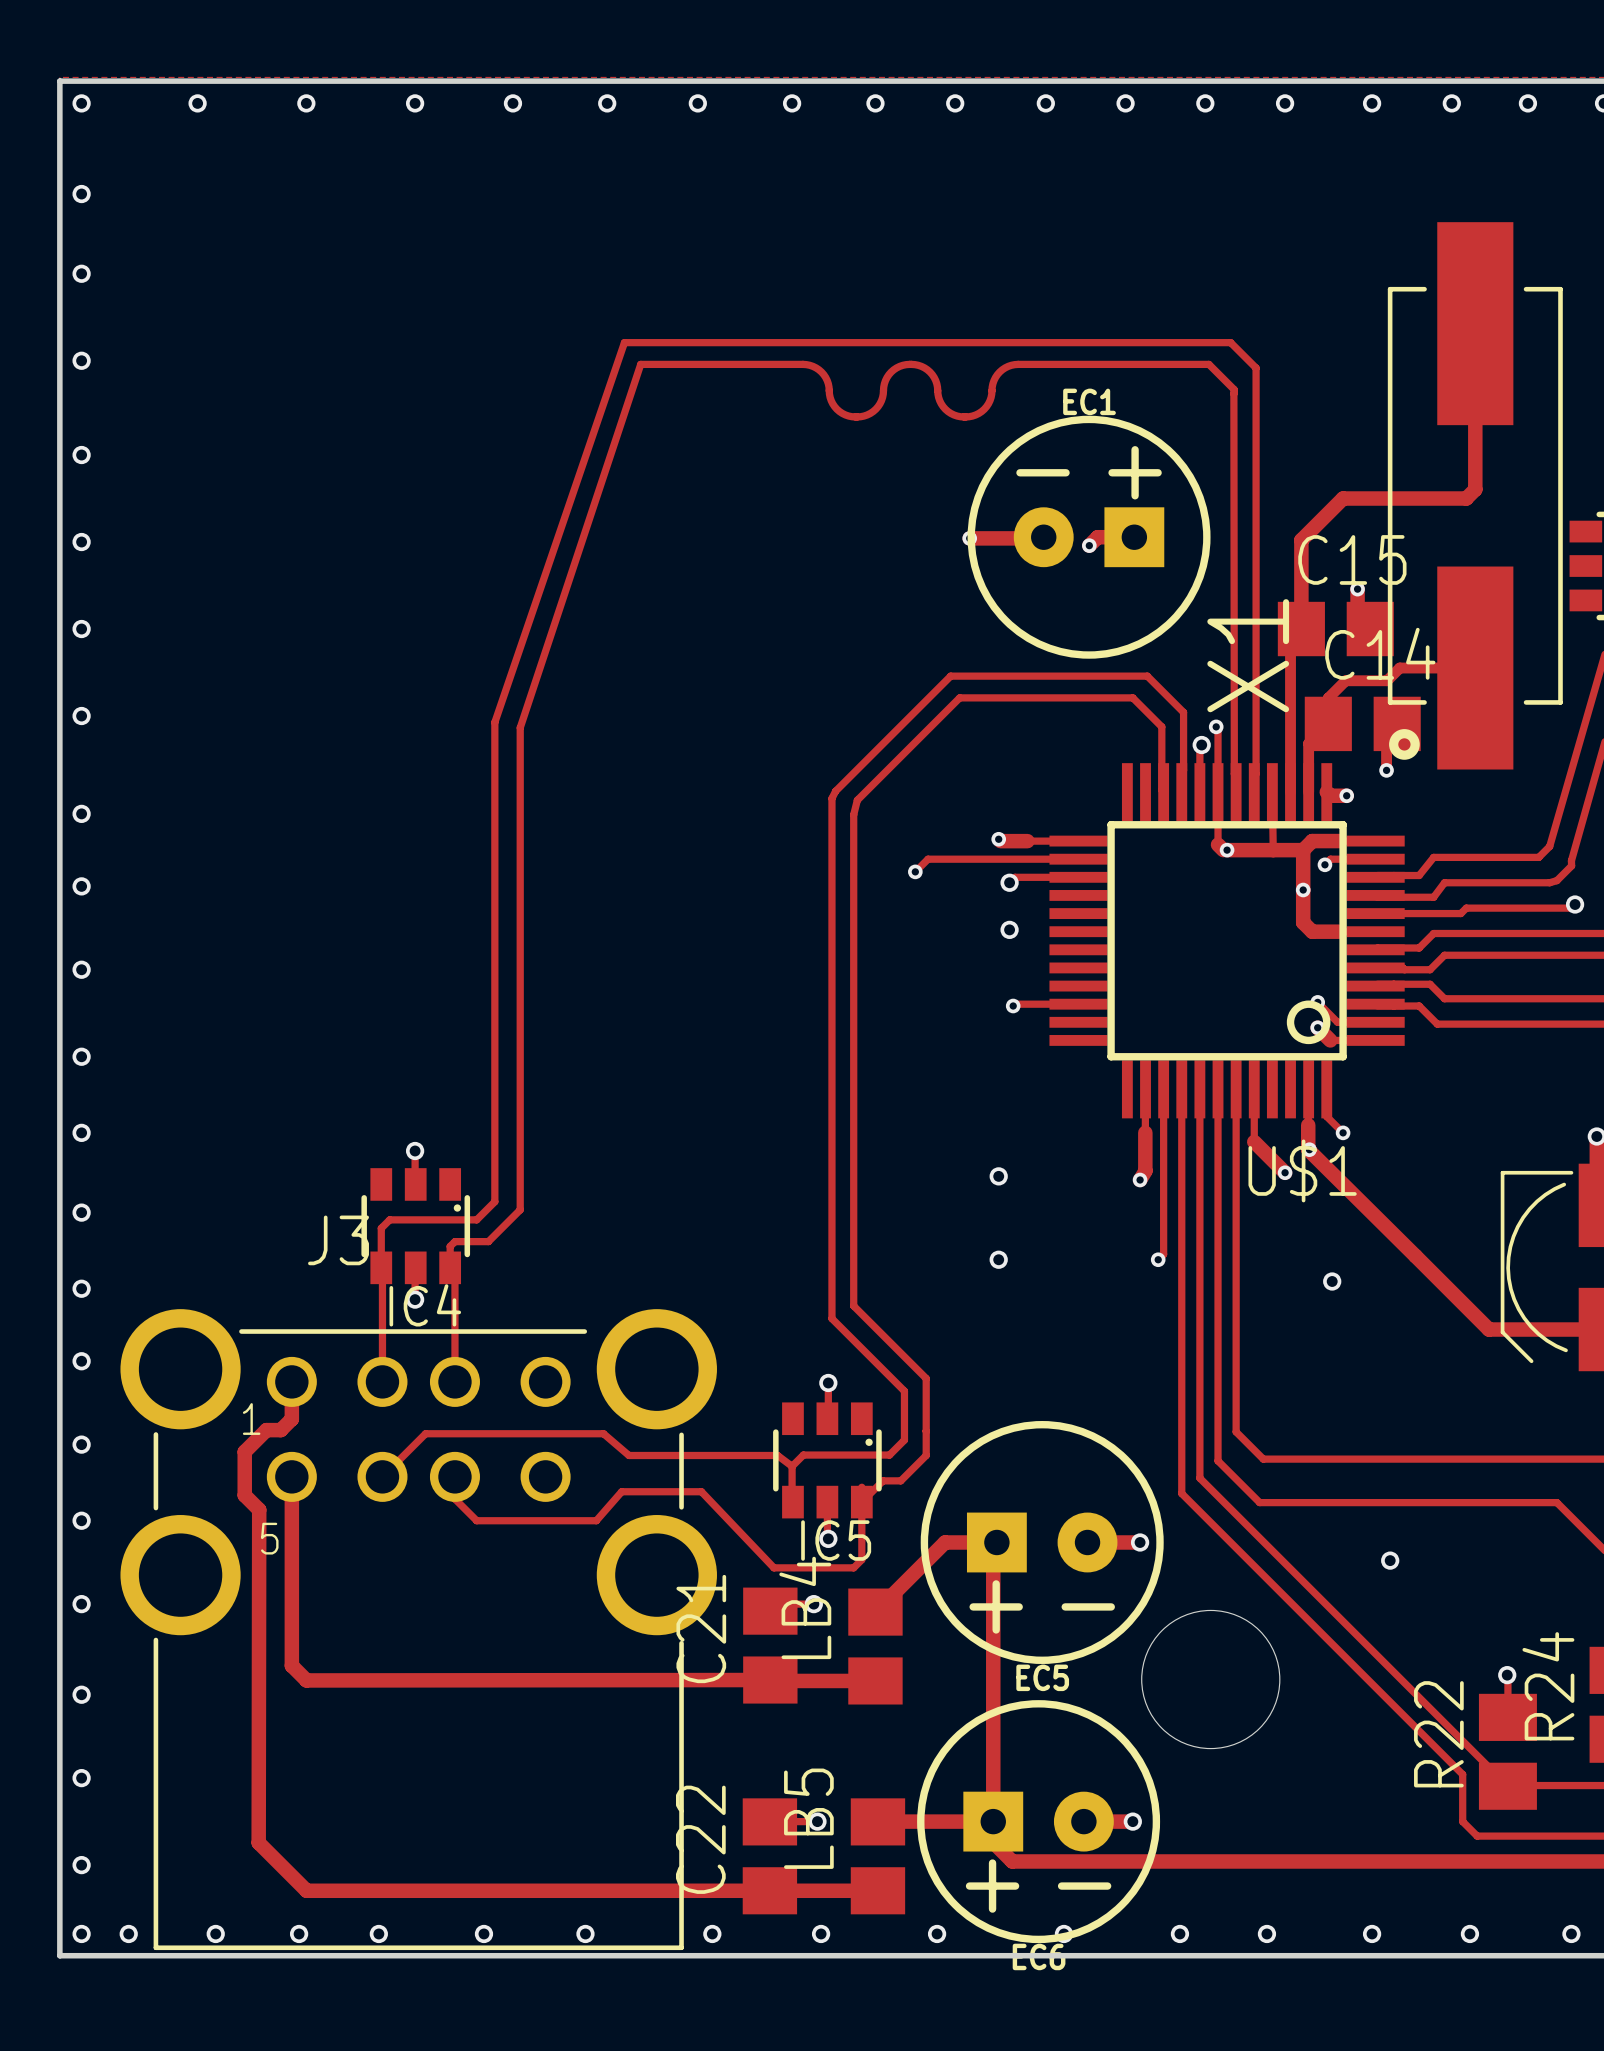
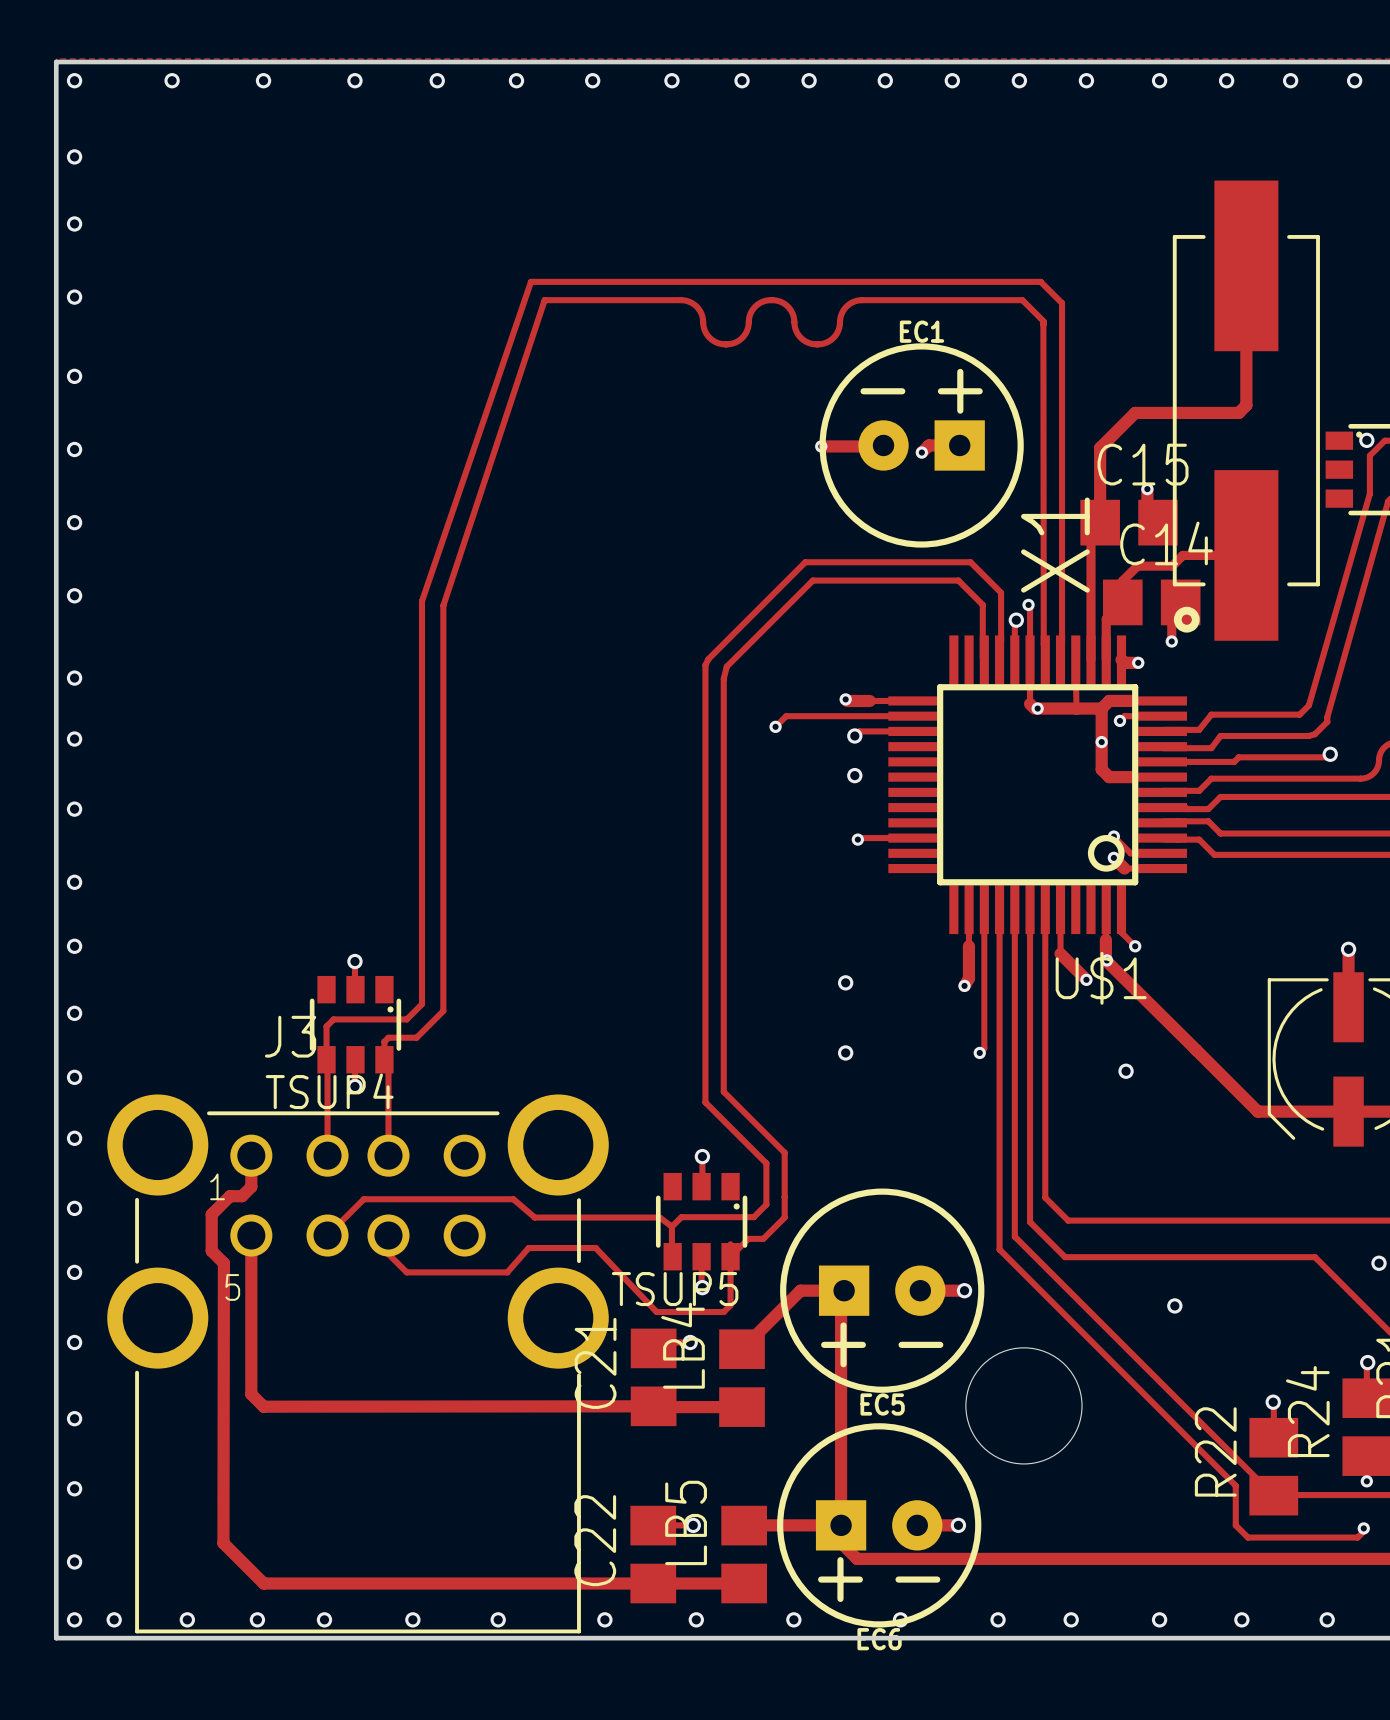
IC4 name: IC4 (425, 1305) -> TSUP4 (329, 1091)
IC5 name: IC5 (836, 1540) -> TSUP5 (675, 1289)

